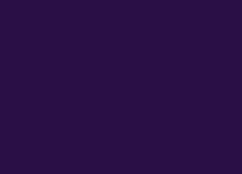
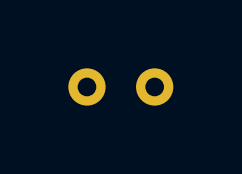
part: none -> (120, 86)

